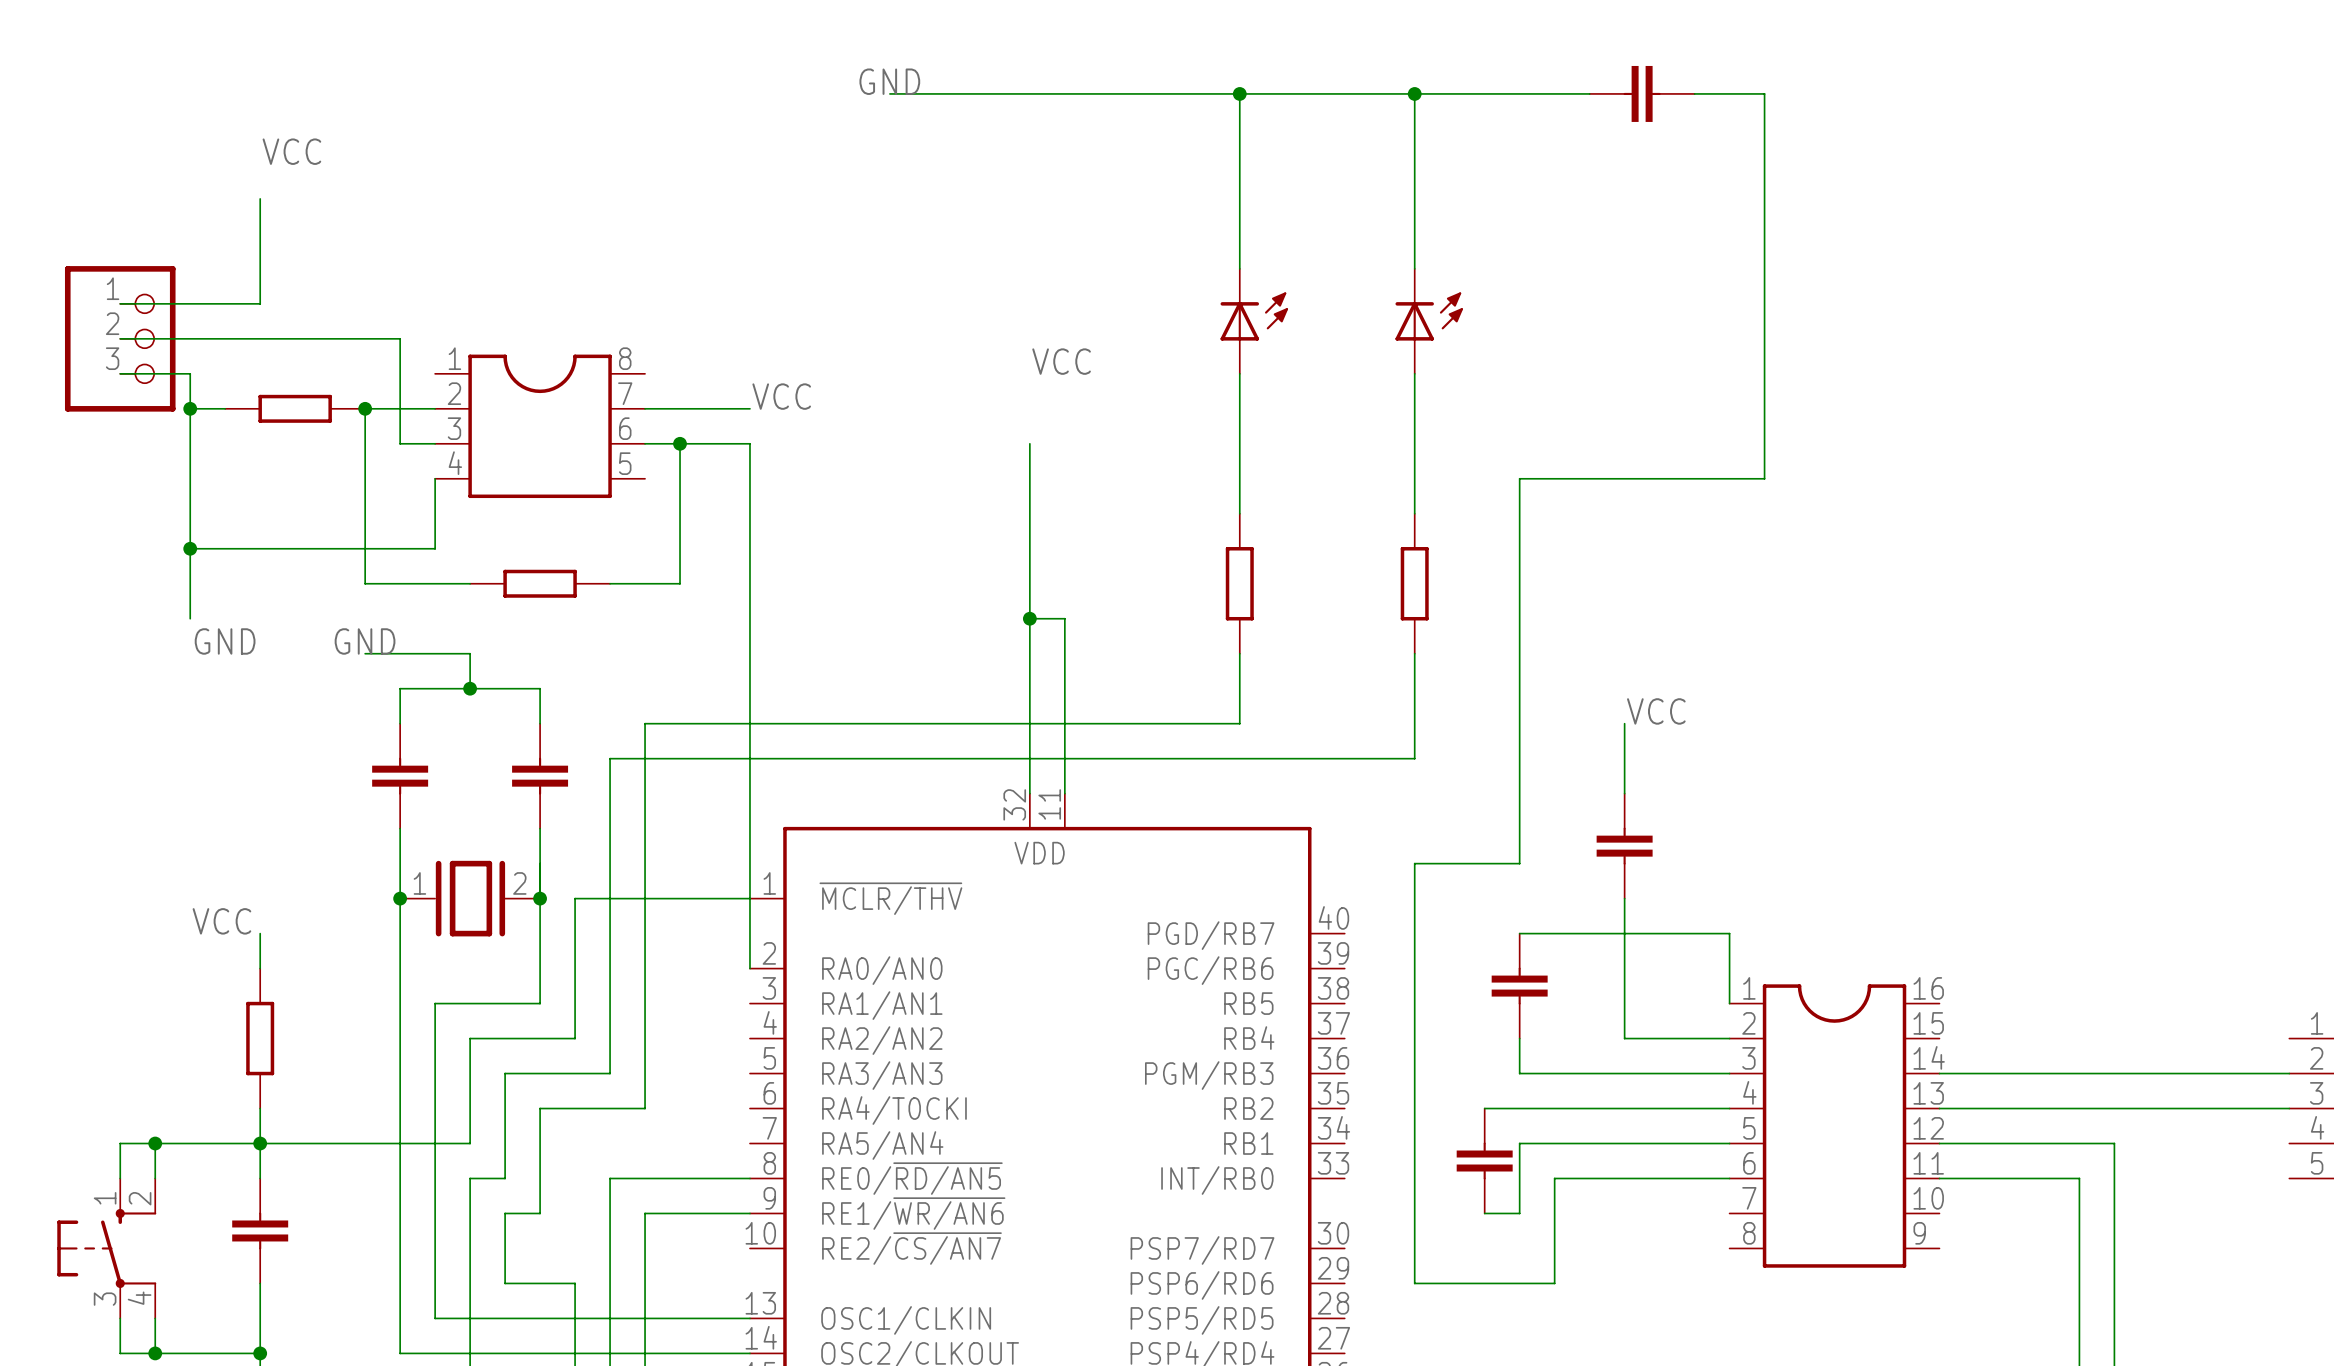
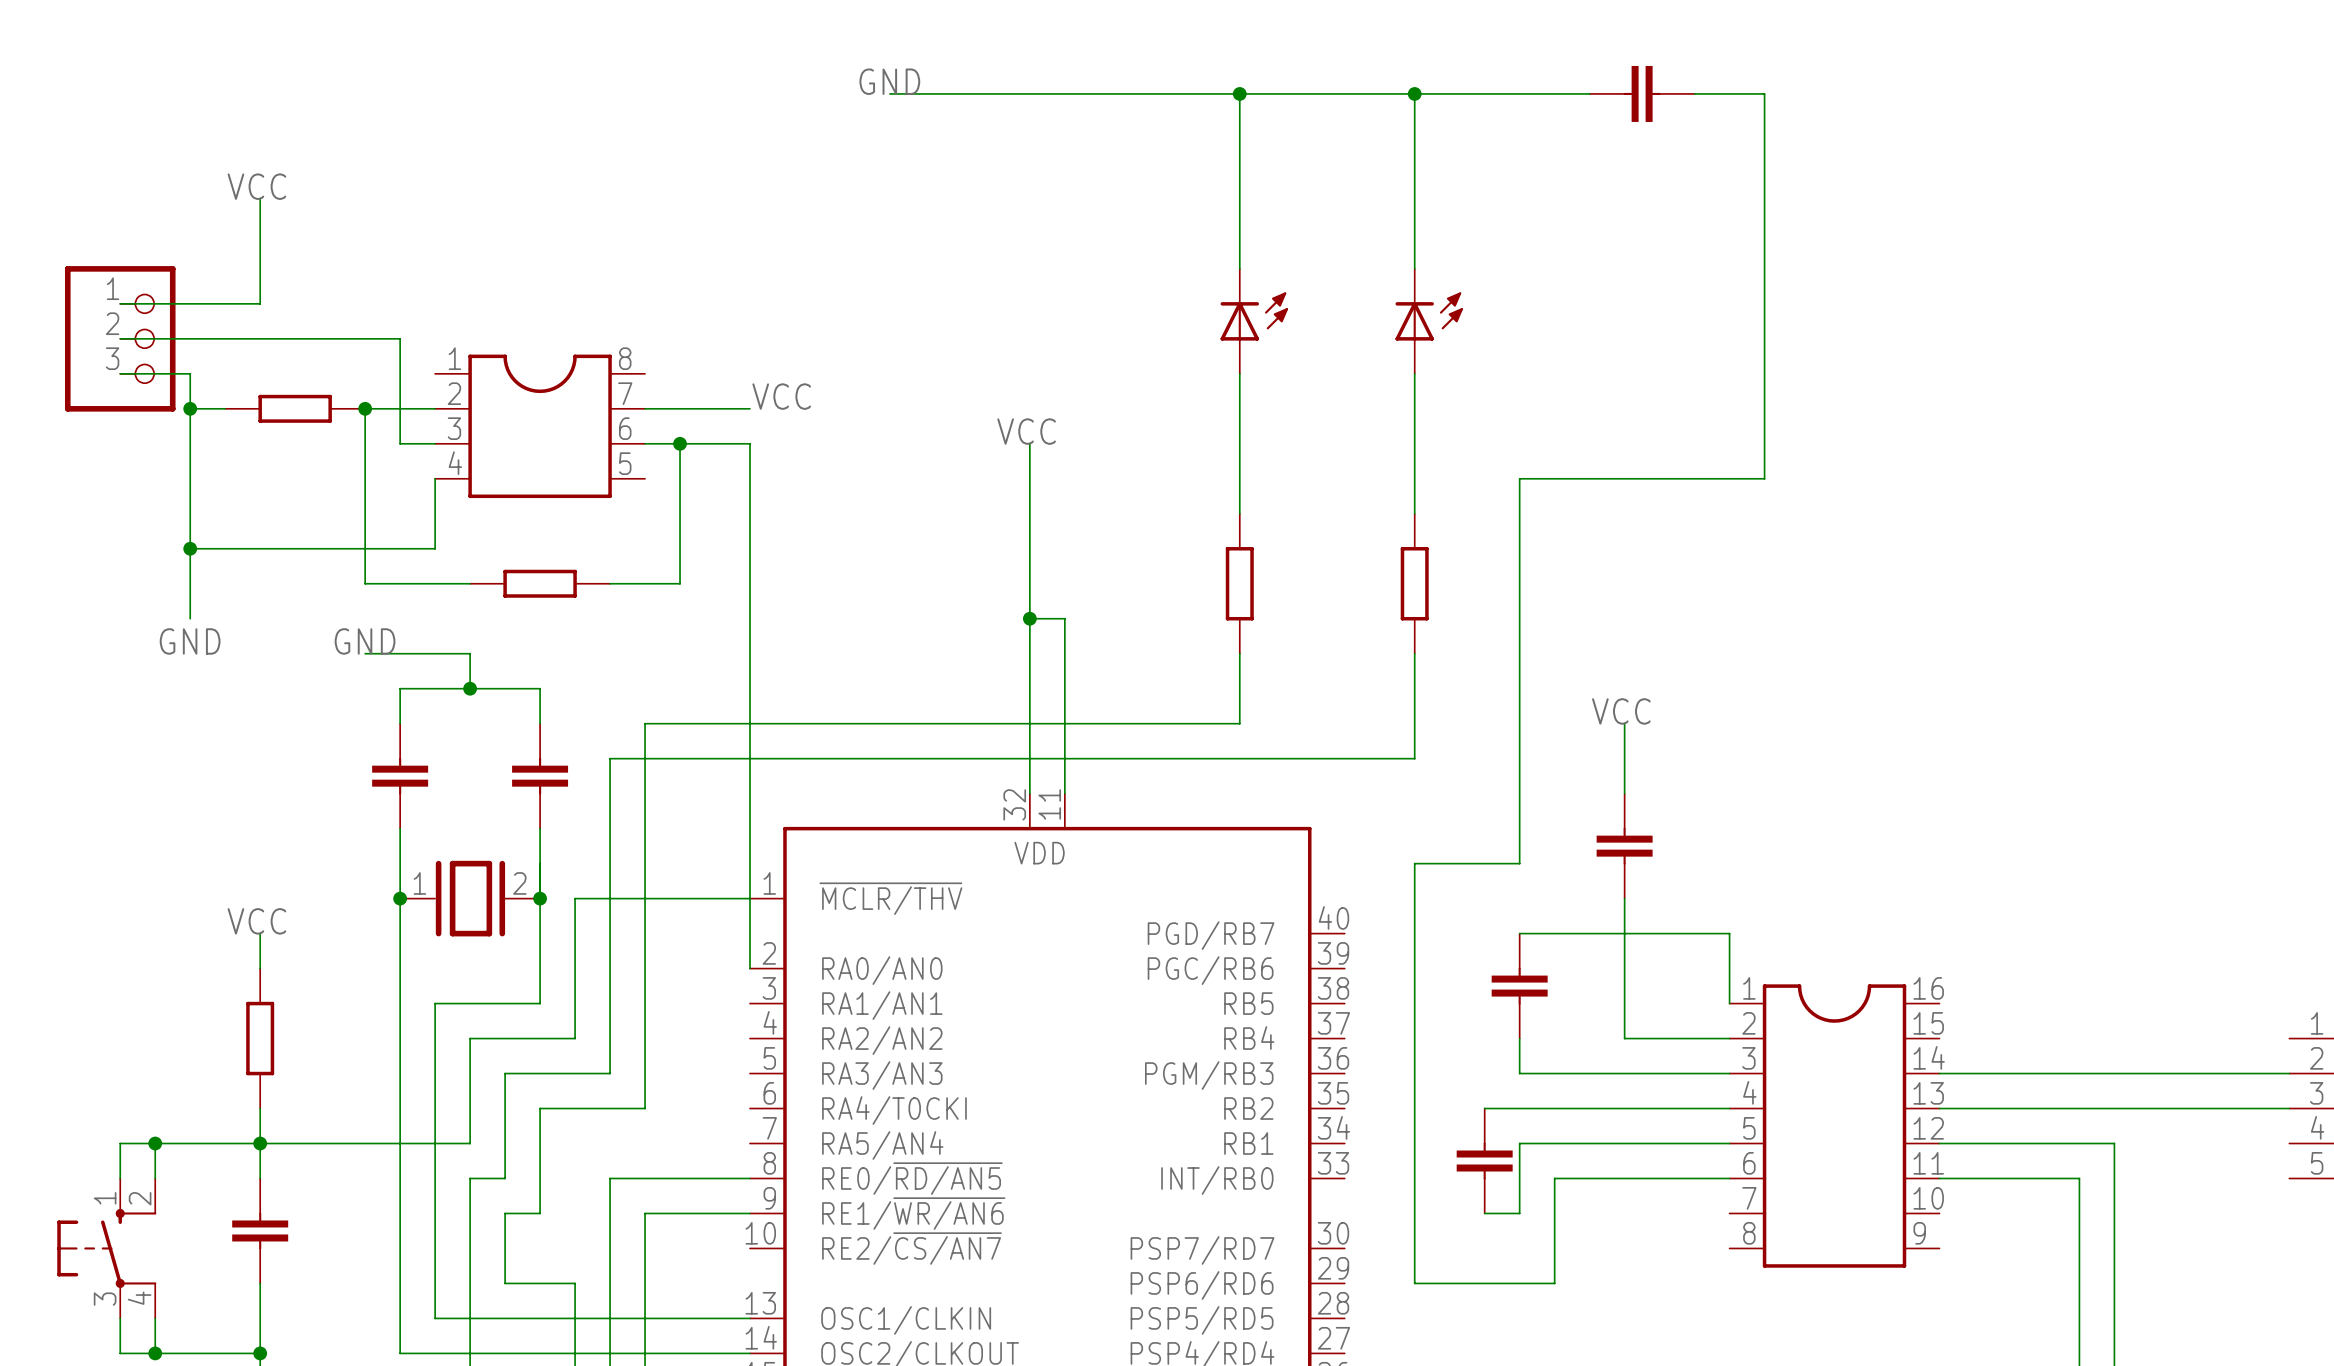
label position: VCC (291, 151) -> VCC (256, 186)
label position: VCC (1061, 361) -> VCC (1026, 431)
label position: GND (225, 641) -> GND (190, 641)
label position: VCC (1656, 711) -> VCC (1621, 711)
label position: VCC (221, 921) -> VCC (256, 921)

